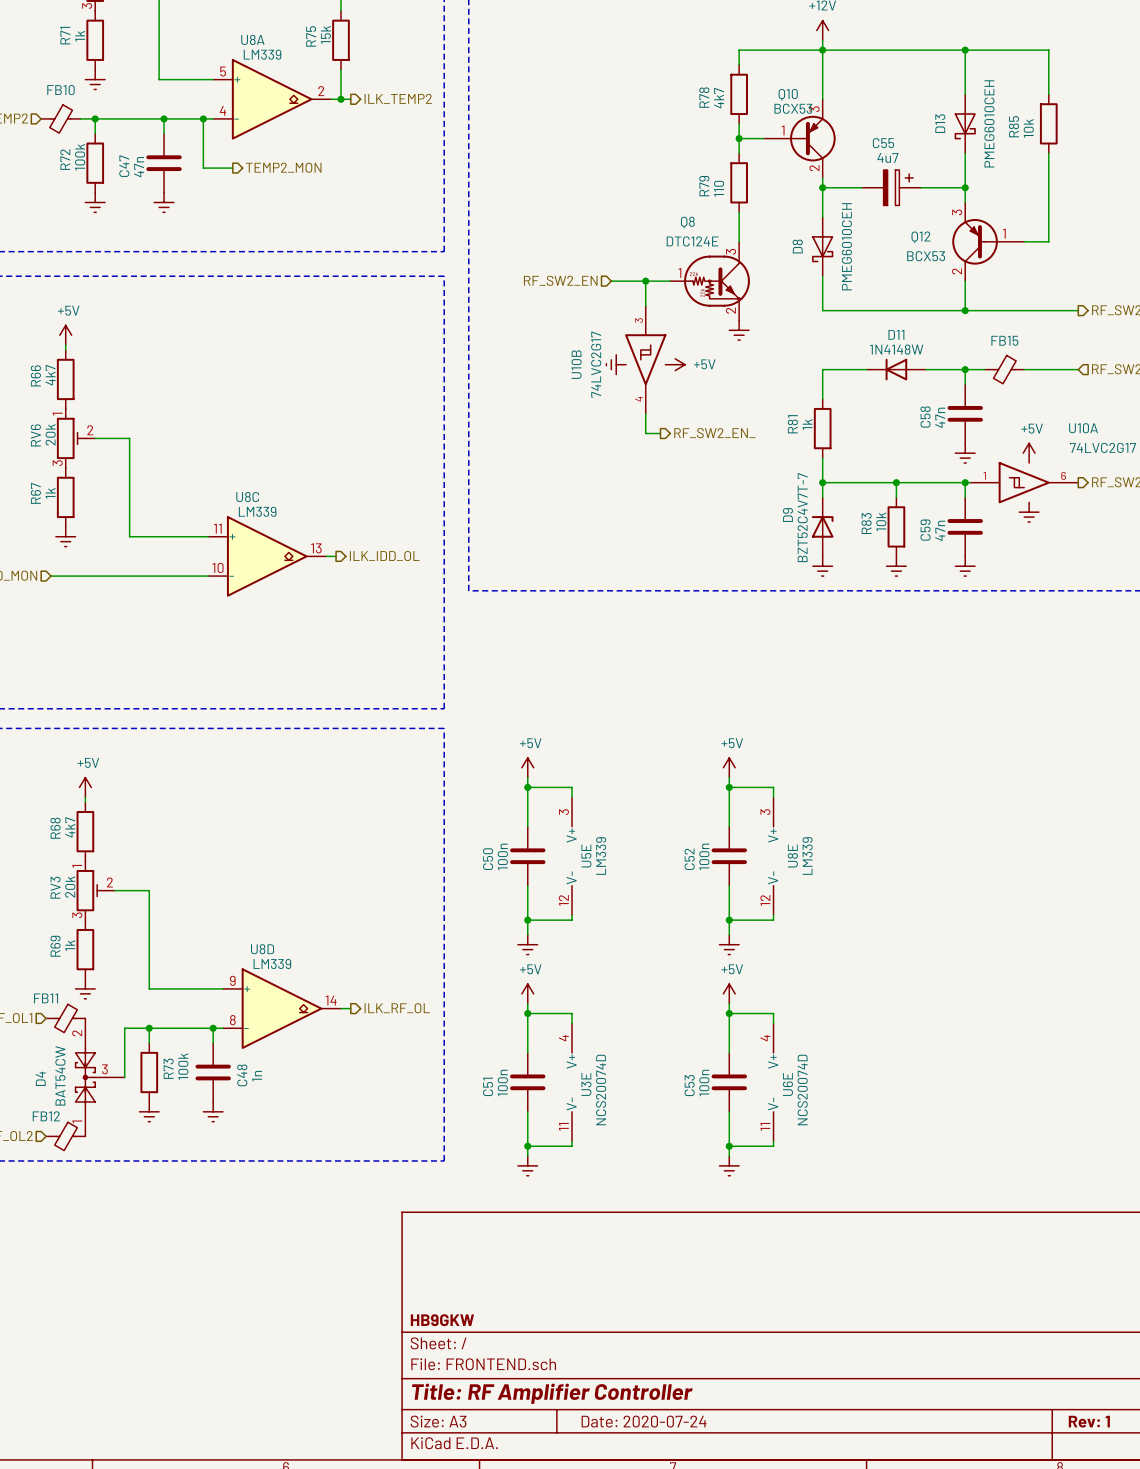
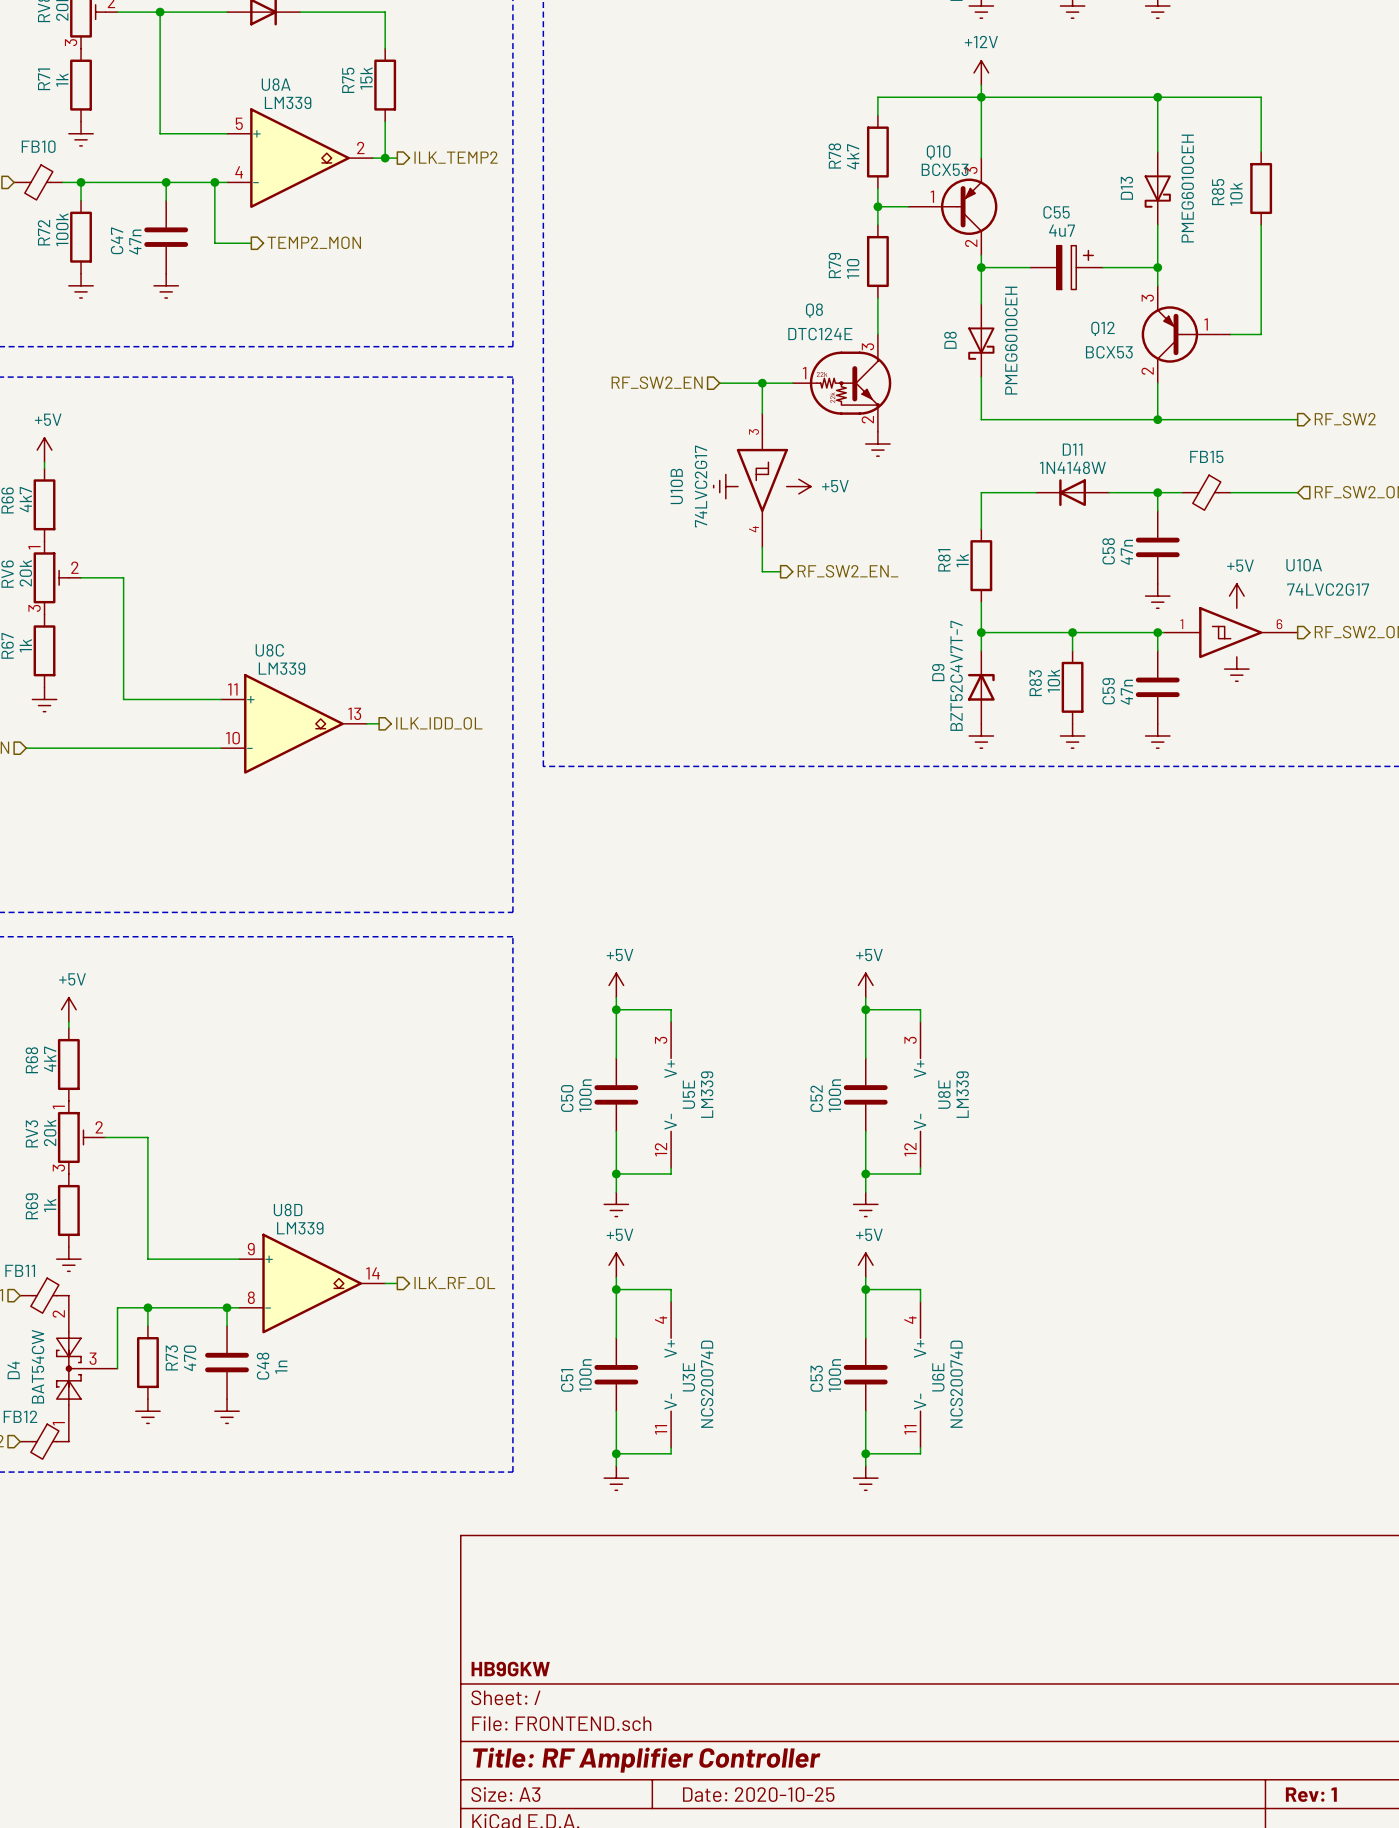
R73 value: 100k (183, 1066) -> 470 (190, 1358)
title block: Date: 2020-07-24 (644, 1421) -> Date: 2020-10-25 (758, 1794)

